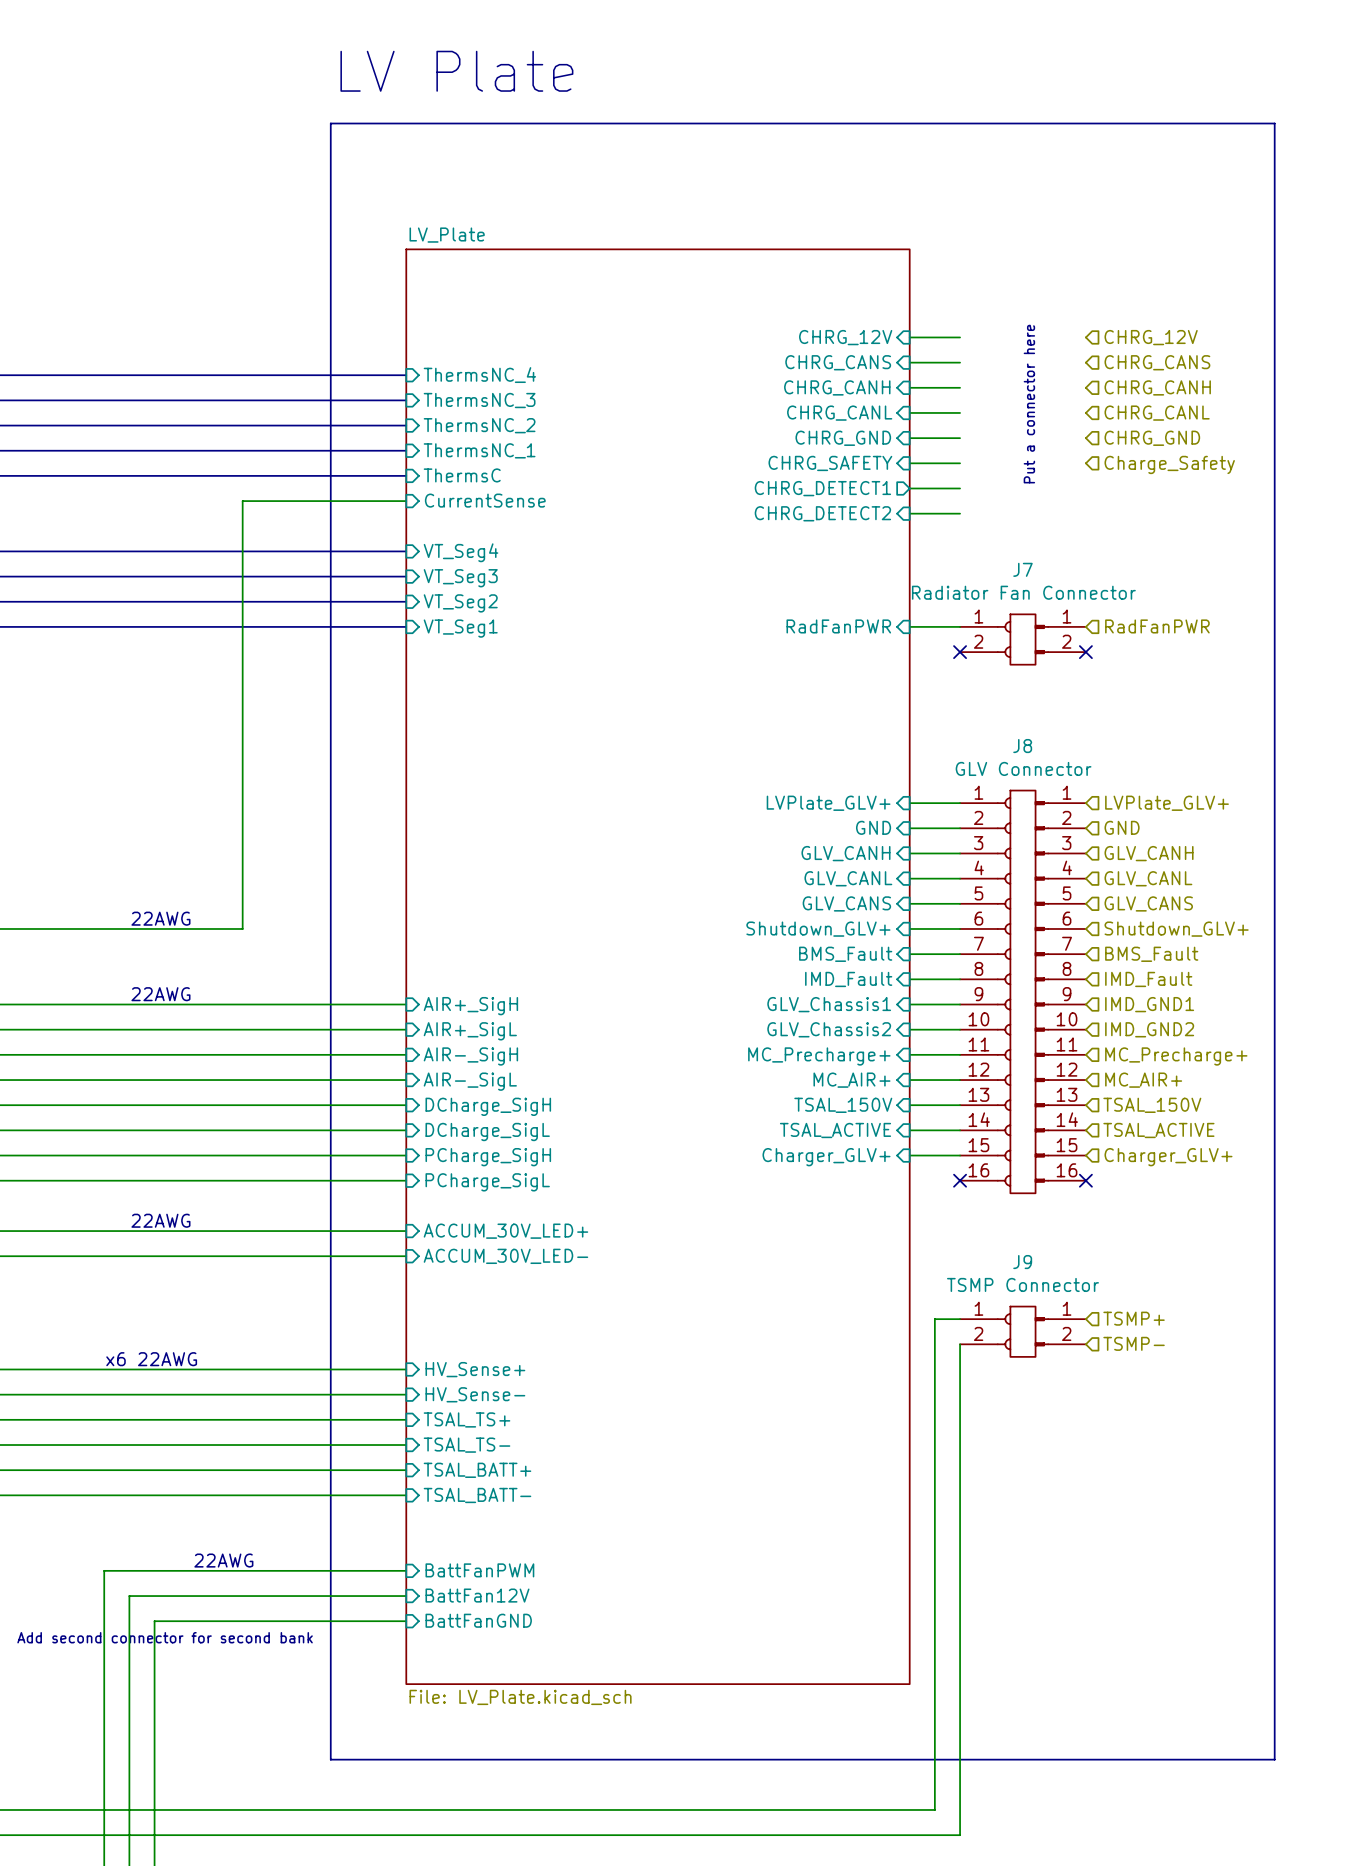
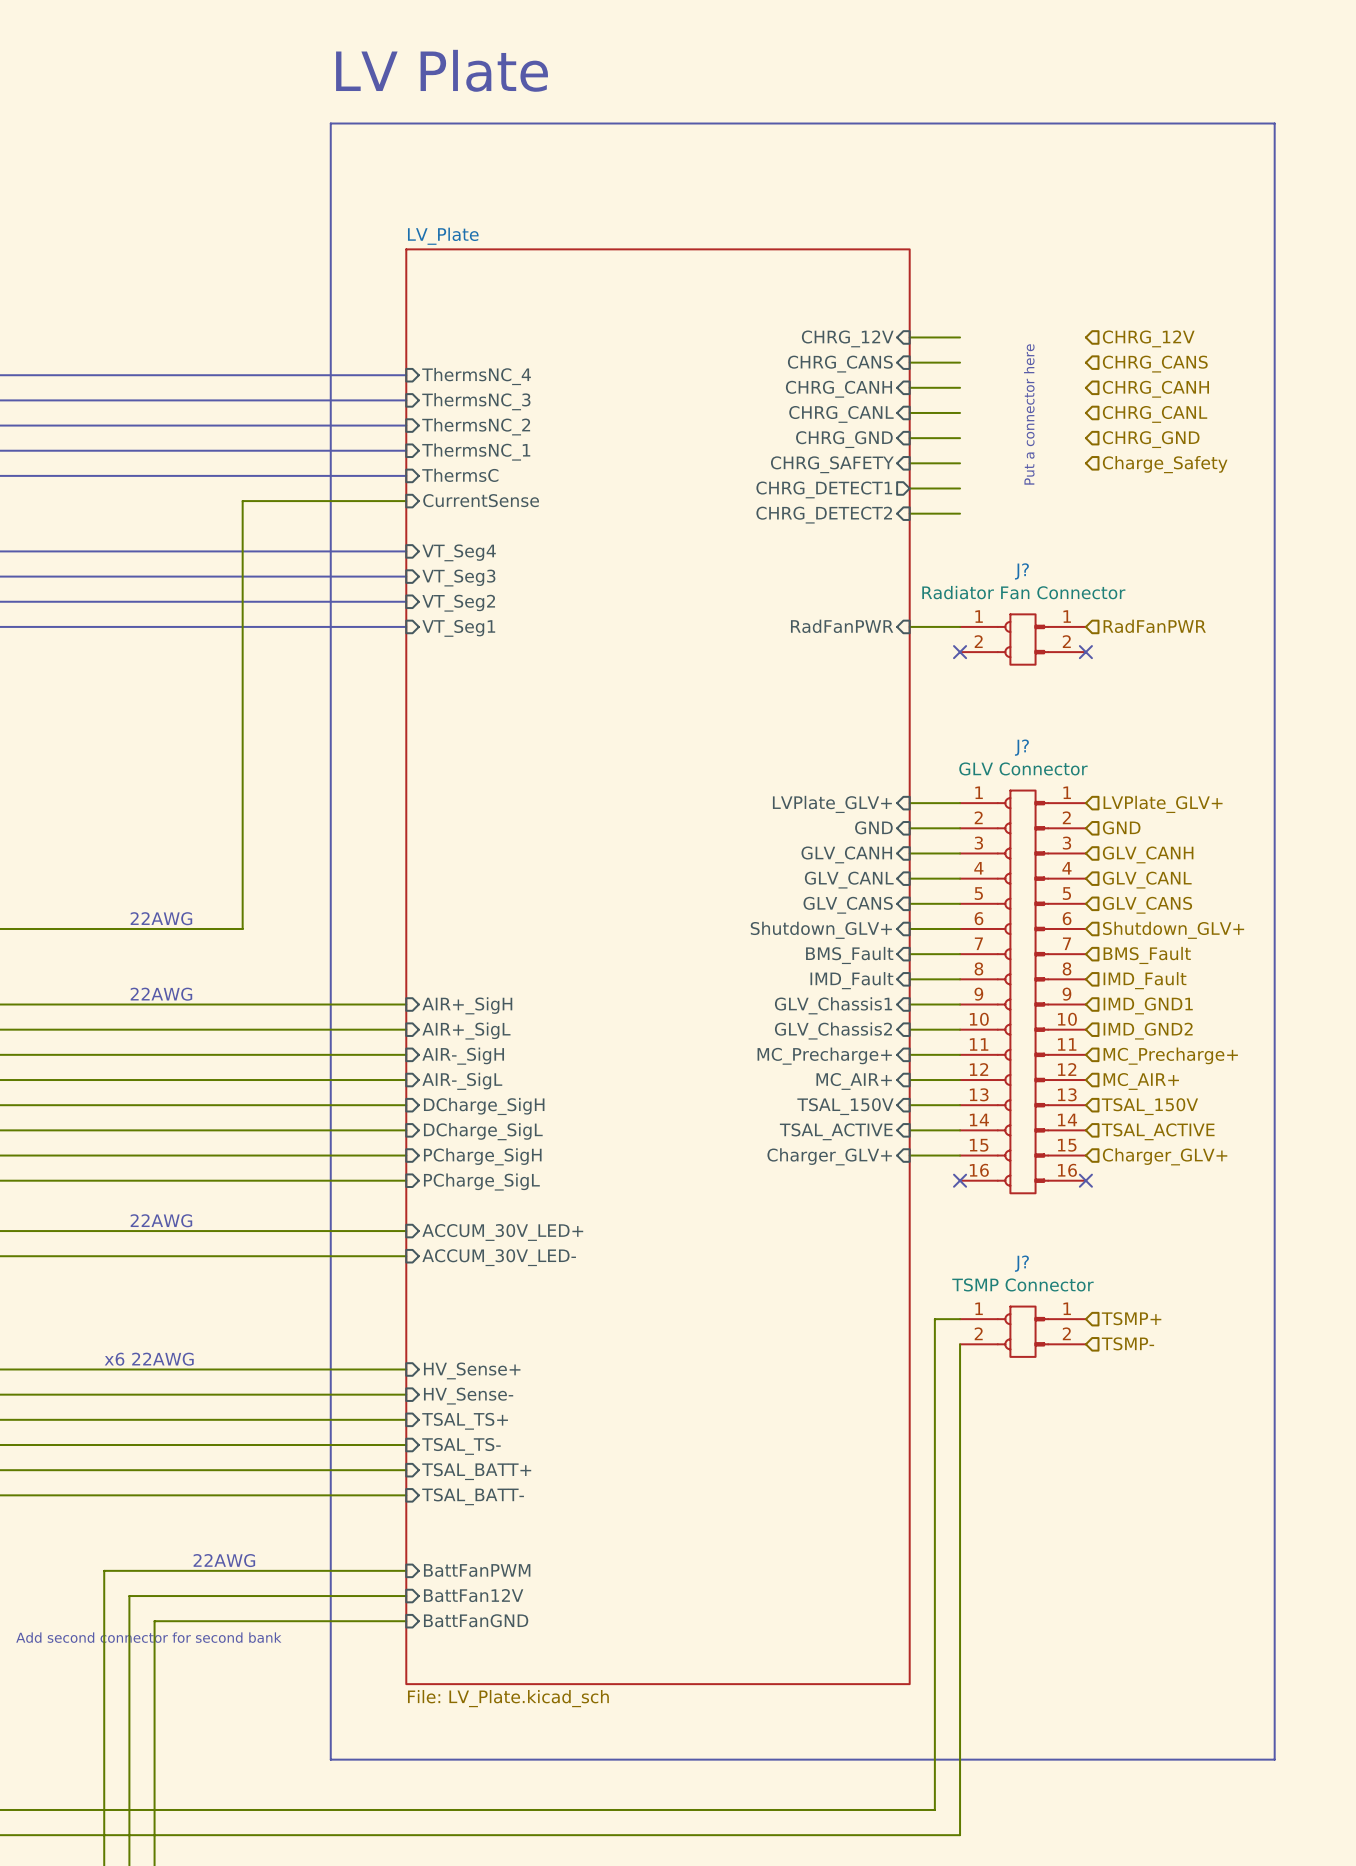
J7 name: J7 (1022, 569) -> J? (1021, 571)
J8 name: J8 (1022, 746) -> J? (1021, 747)
J9 name: J9 (1022, 1262) -> J? (1021, 1263)

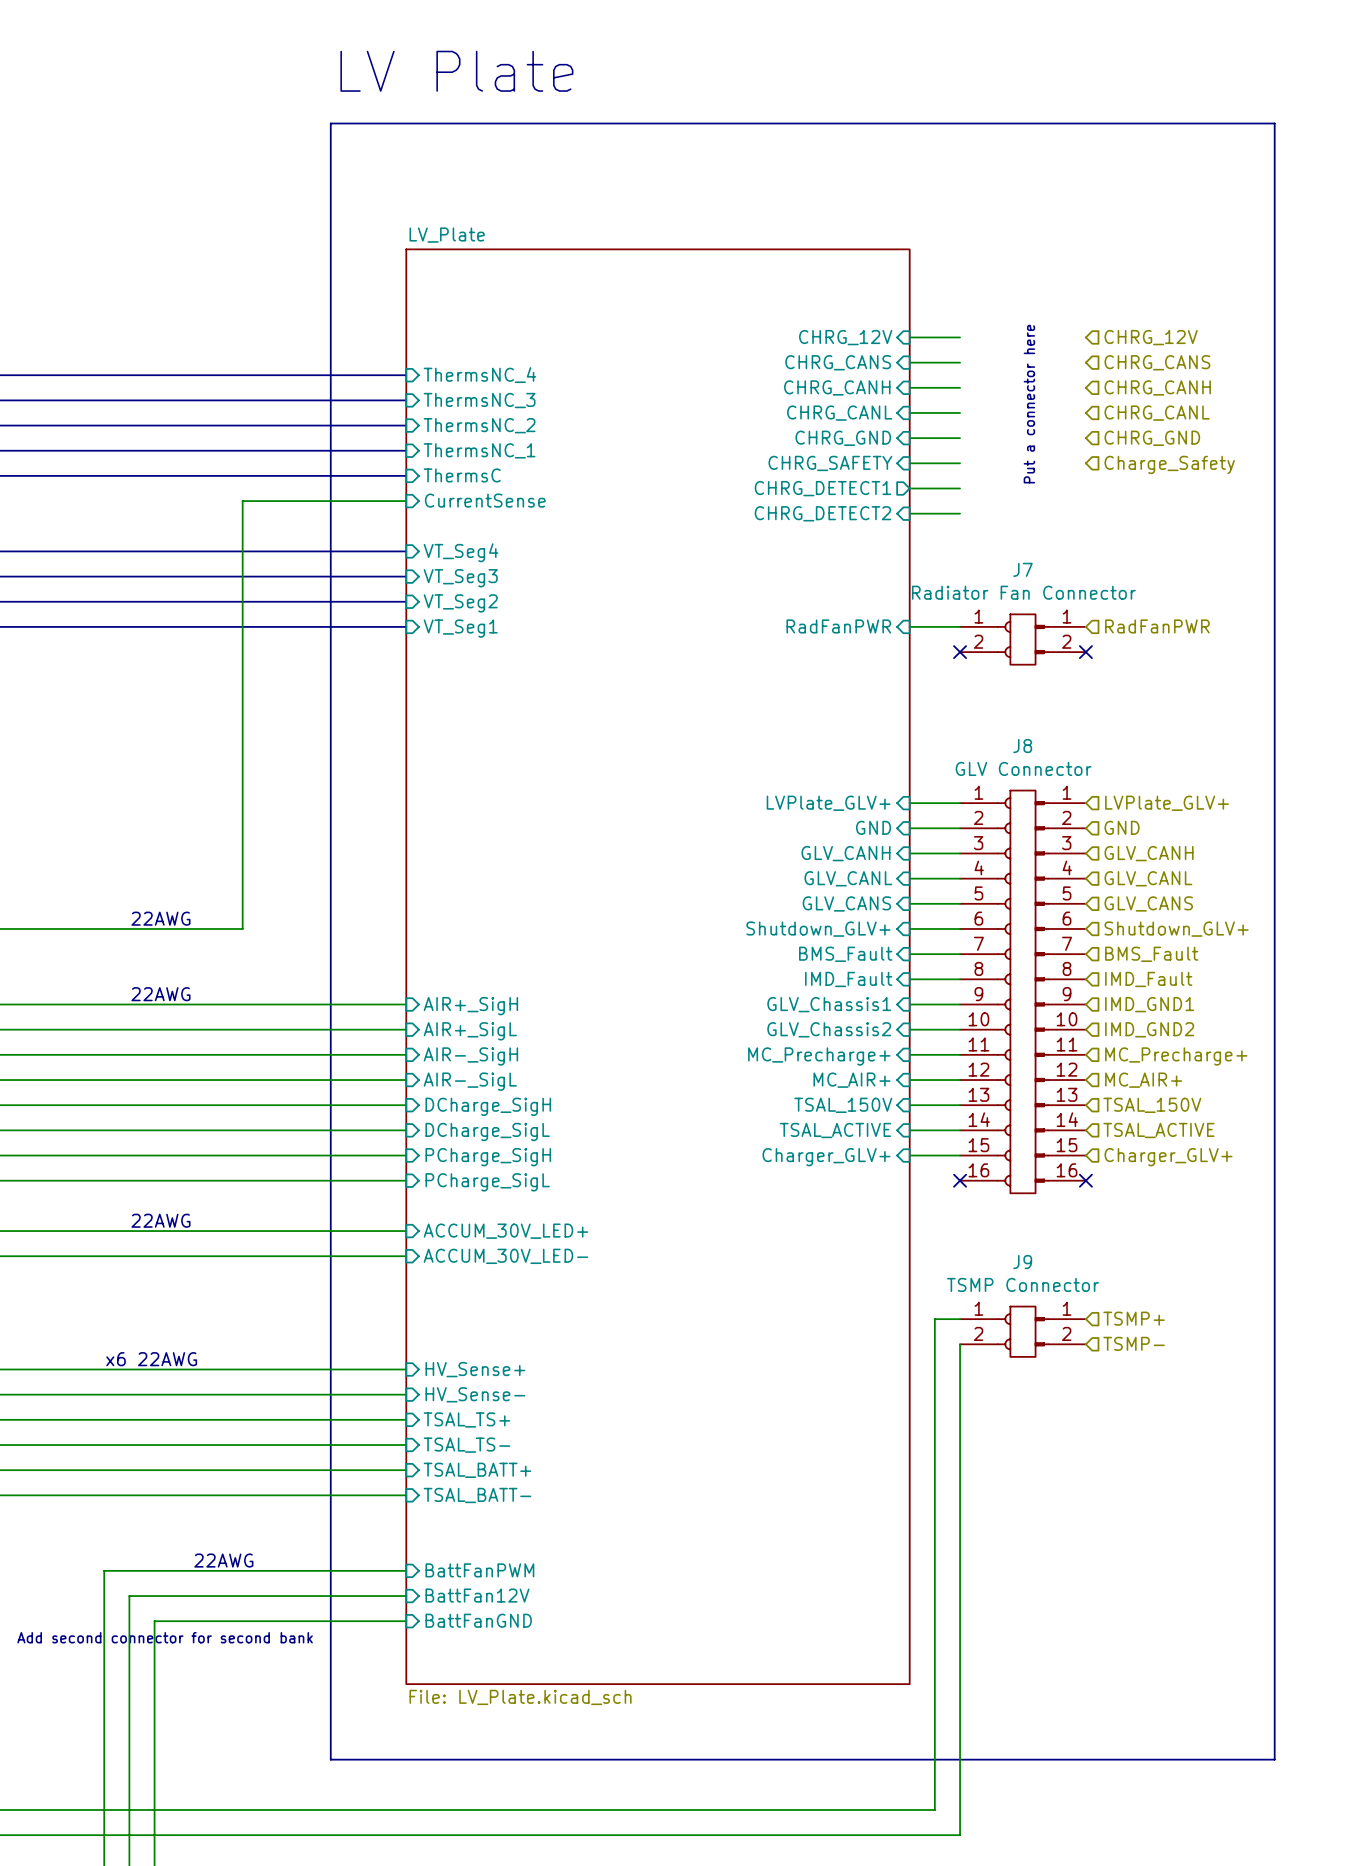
J? name: J? (1021, 571) -> J7 (1022, 569)
J? name: J? (1021, 747) -> J8 (1022, 746)
J? name: J? (1021, 1263) -> J9 (1022, 1262)

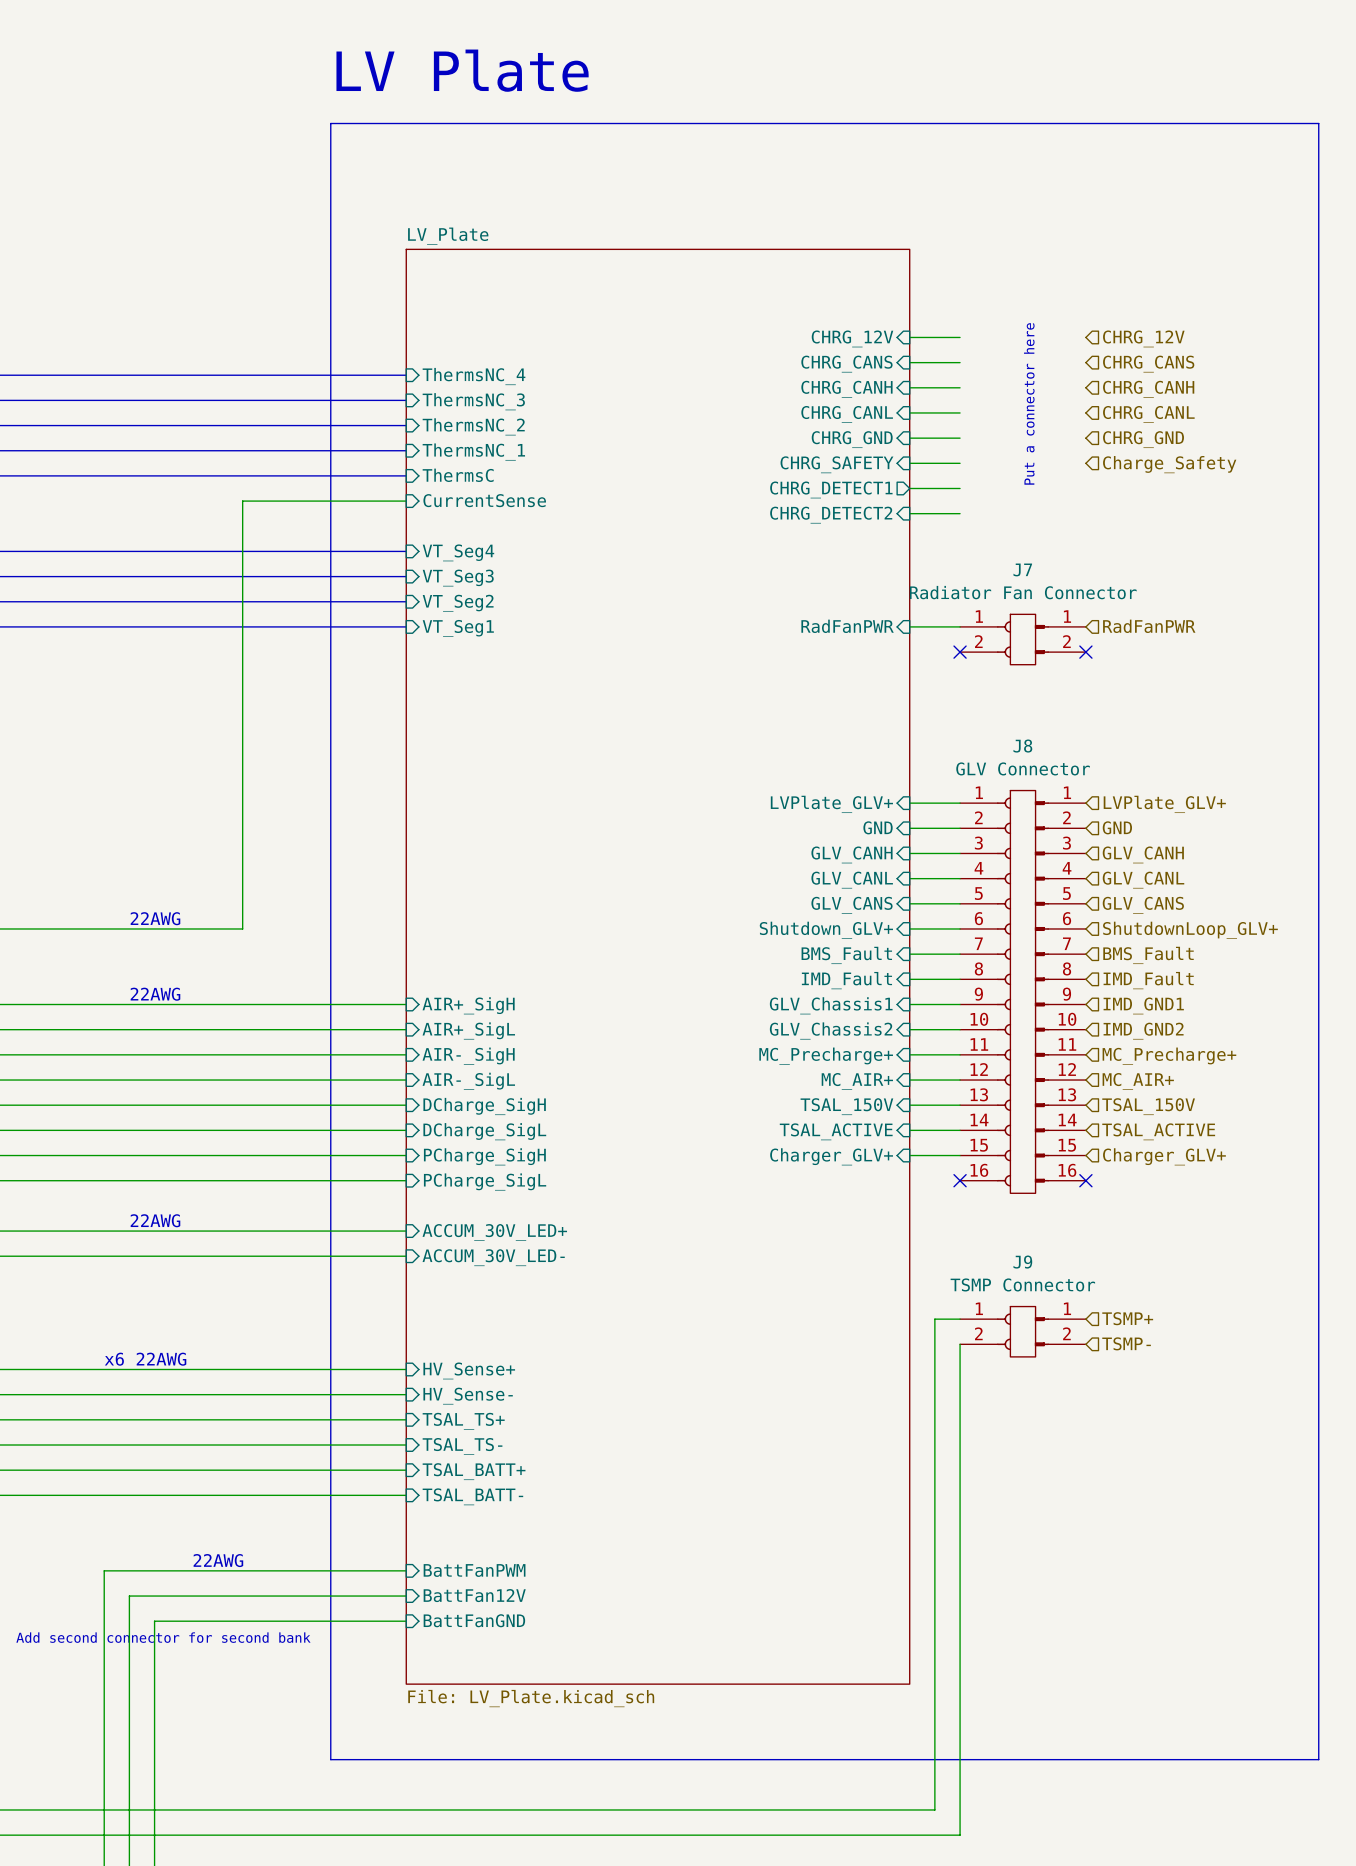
line: (1274, 123) (1274, 1759) -> (1274, 123) (1318, 123) (1318, 1759) (1274, 1759)
hierarchical label: Shutdown_GLV+ (1176, 929) -> ShutdownLoop_GLV+ (1190, 930)

